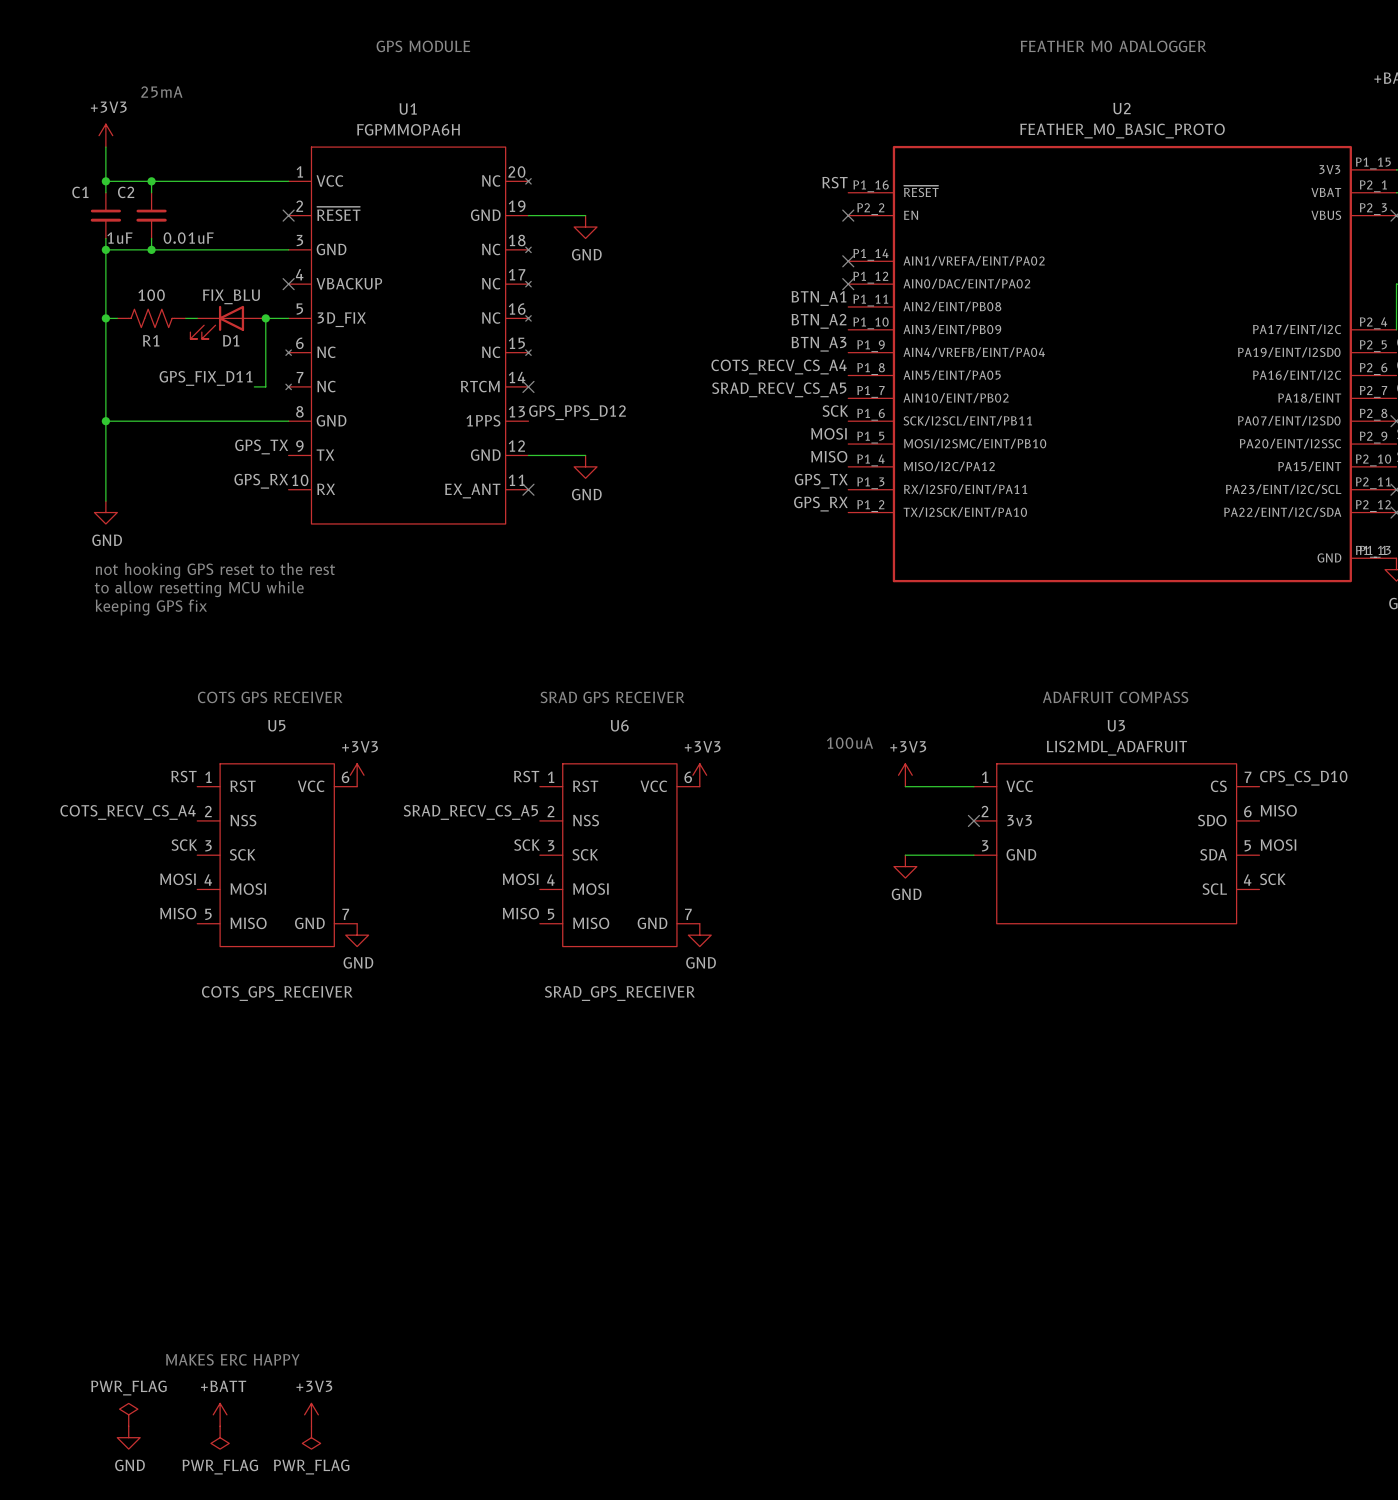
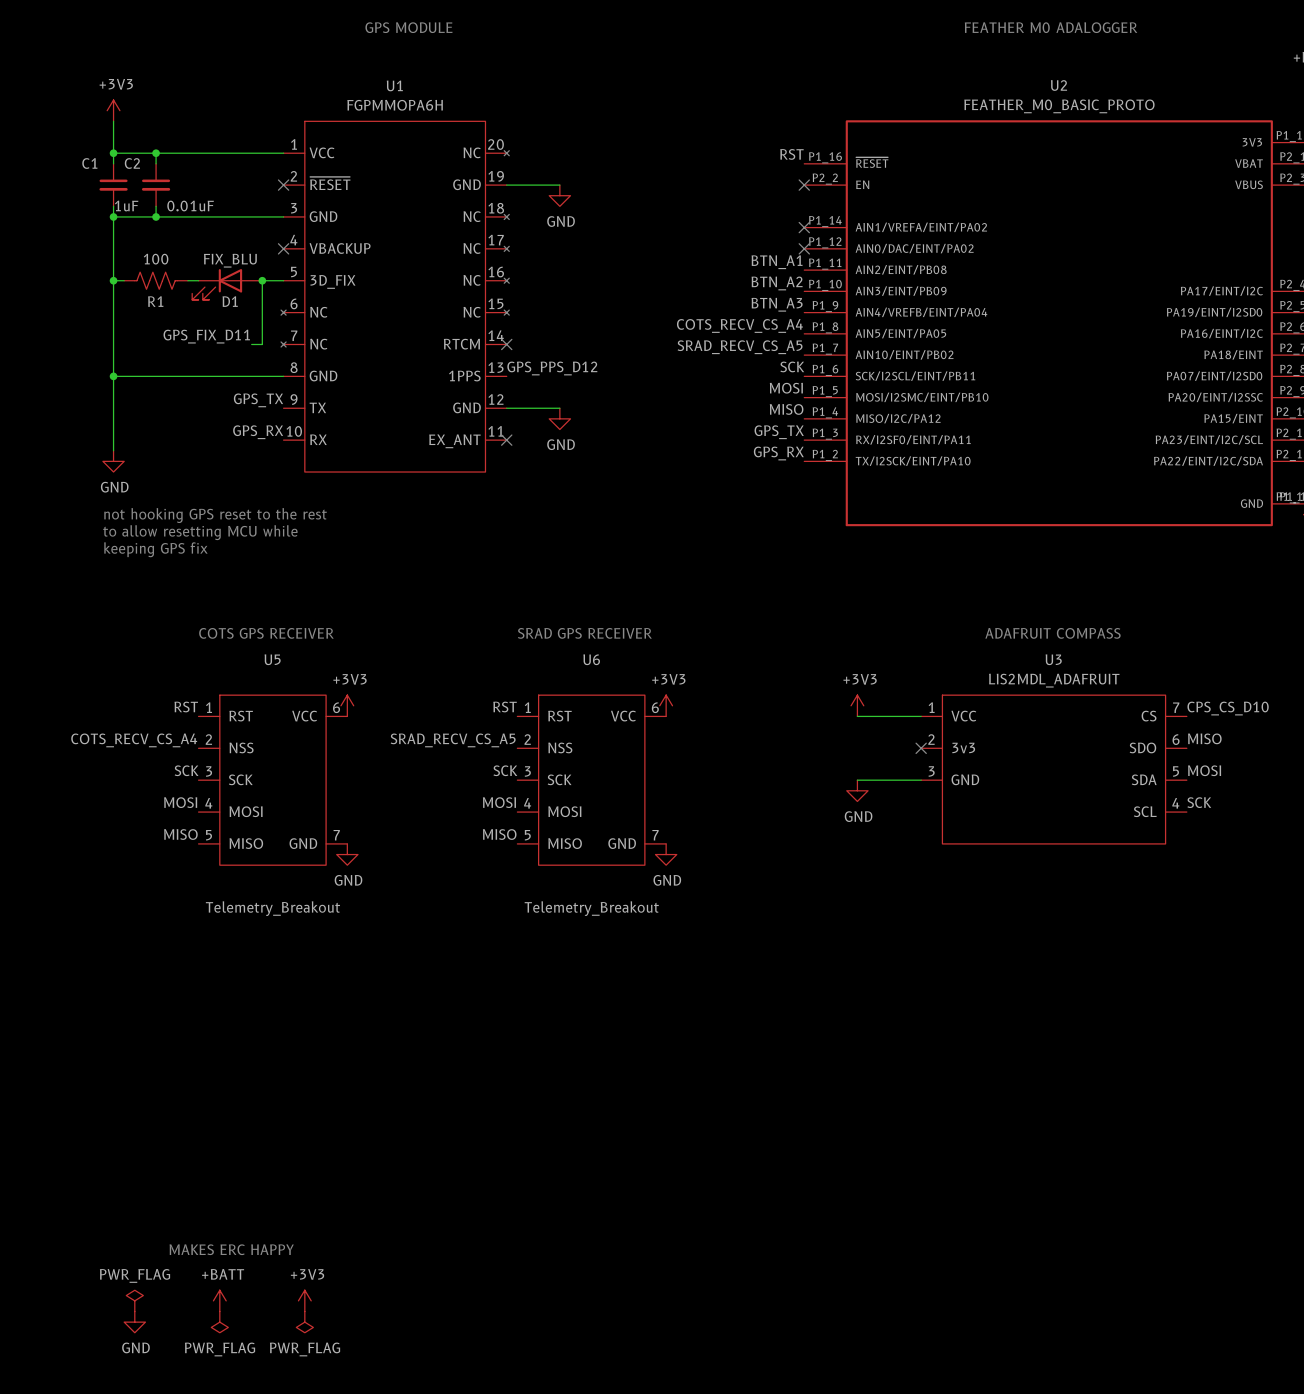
text: 25mA (161, 92) -> none
text: 100uA (849, 743) -> none
U5 value: COTS_GPS_RECEIVER (277, 993) -> Telemetry_Breakout (272, 908)
U6 value: SRAD_GPS_RECEIVER (619, 993) -> Telemetry_Breakout (591, 908)

